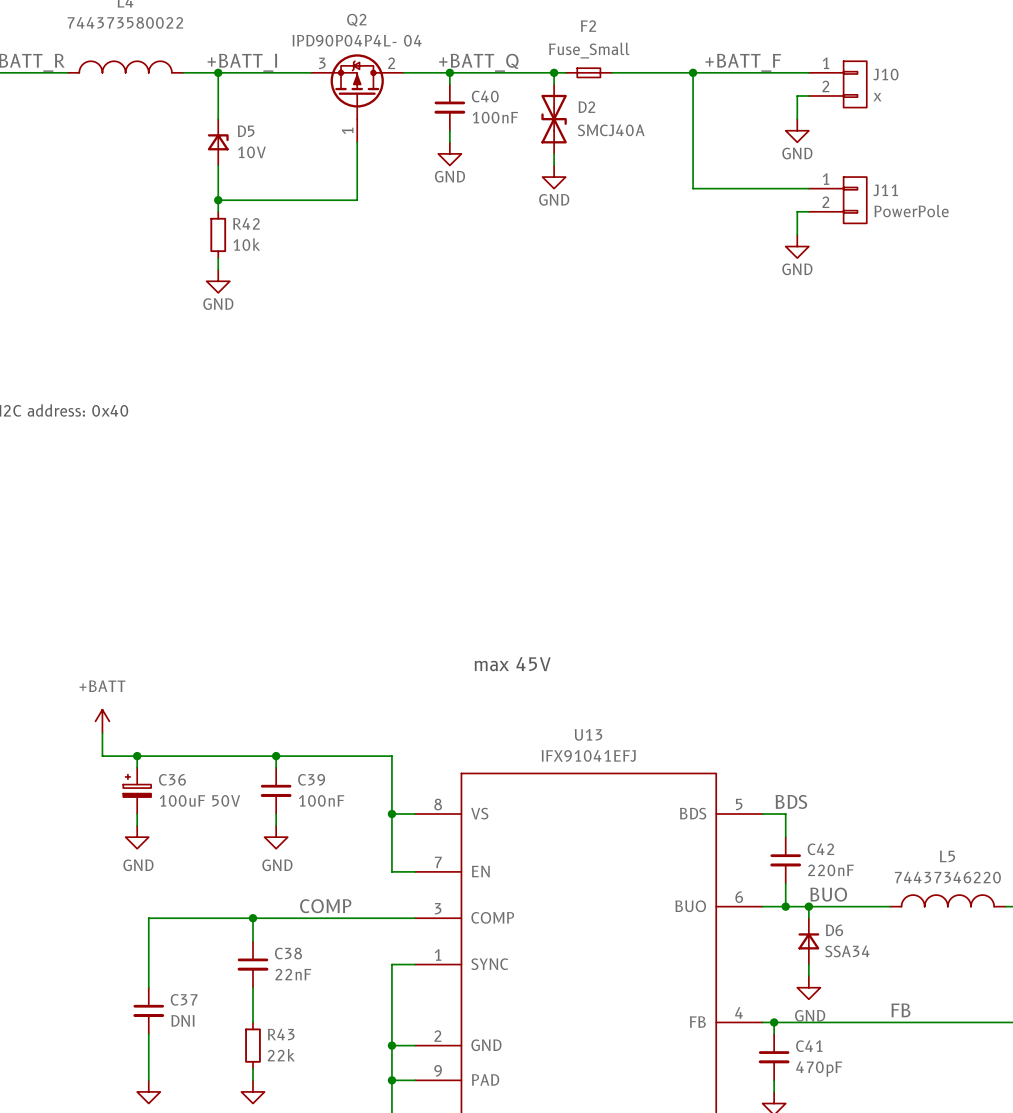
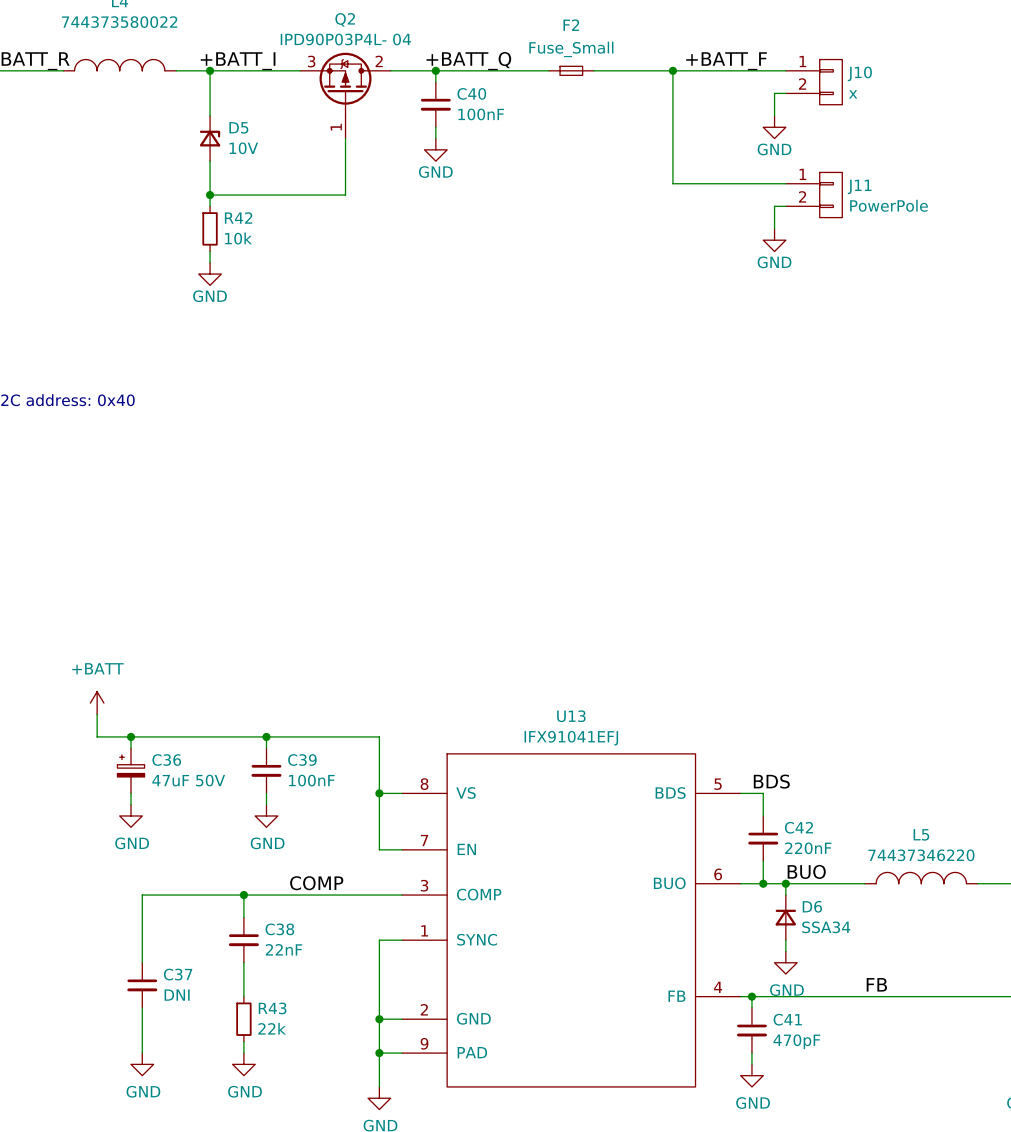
Q2 value: IPD90P04P4L- 04 (357, 40) -> IPD90P03P4L- 04 (345, 39)
wire: (554, 72) (554, 84) -> none
junction: (554, 72) -> none
D2: SMCJ40A (554, 119) -> none
wire: (554, 153) (554, 165) -> none
power symbol: GND (554, 177) -> none
text: max 45V (512, 664) -> none
C36 value: 100uF 50V (199, 800) -> 47uF 50V (188, 780)

